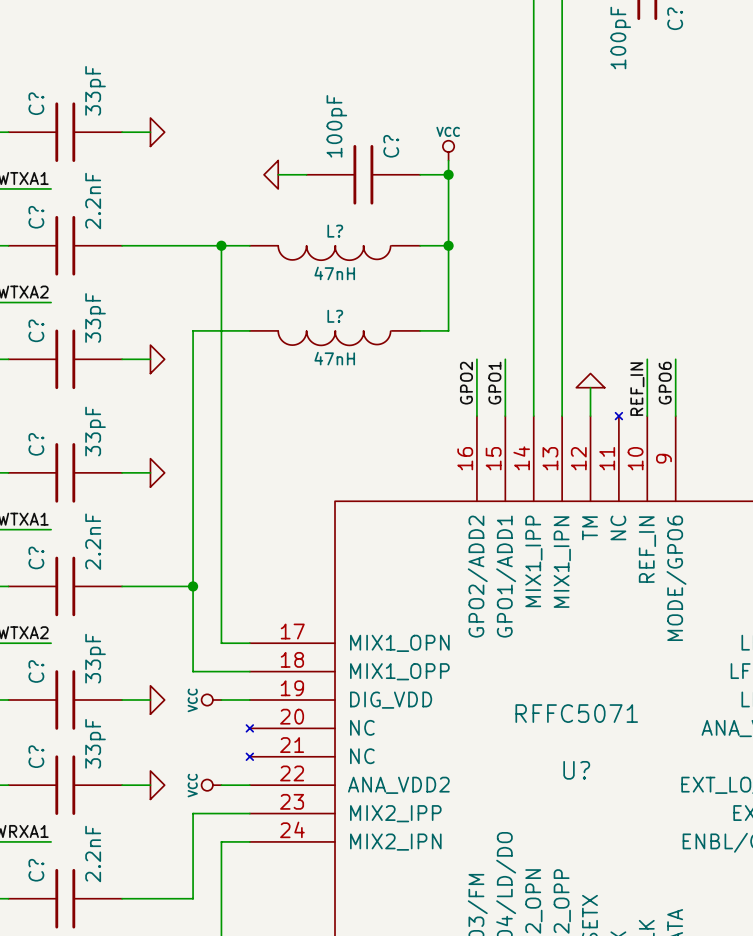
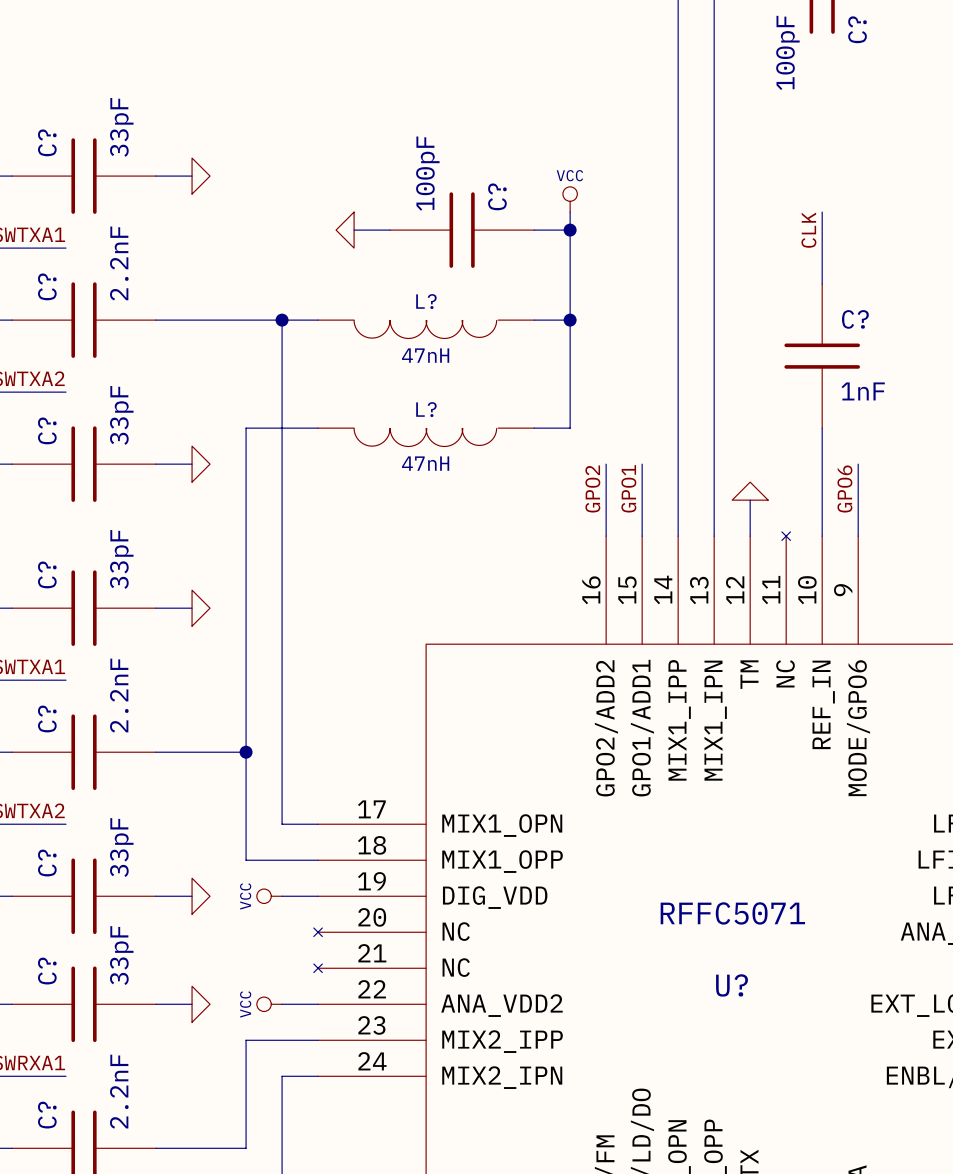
wire: none -> (822, 212) (822, 284)
label: none -> CLK (808, 230)
C?: none -> 1nF (822, 356)
wire: none -> (822, 428) (822, 464)
label: REF_IN (637, 389) -> none

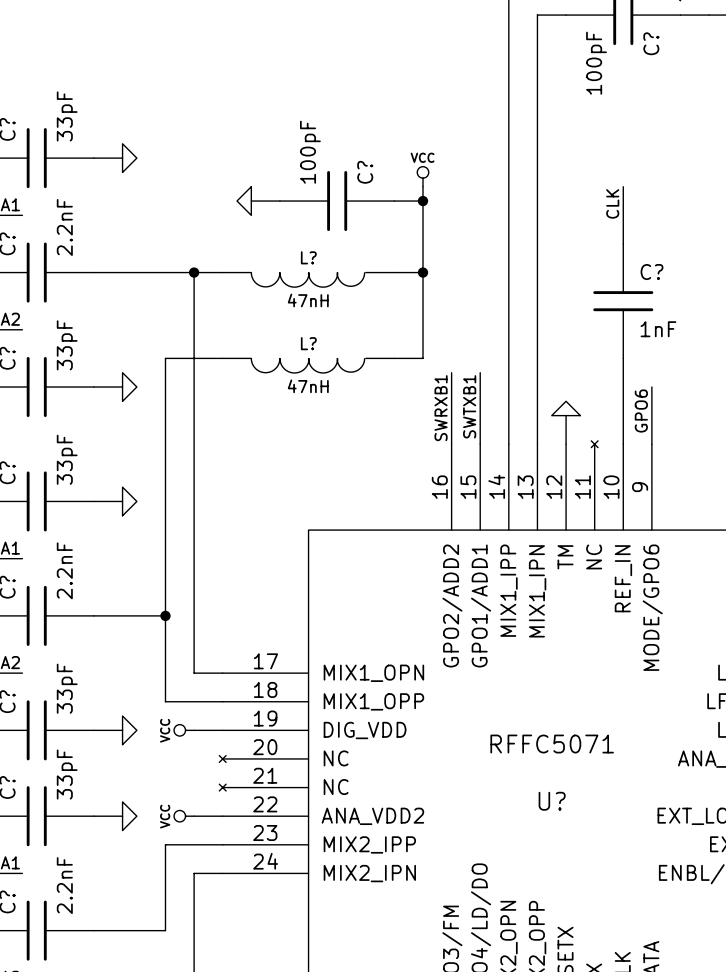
wire: none -> (451, 372) (451, 387)
wire: none -> (480, 372) (480, 387)
label: none -> SWRXB1 (441, 408)
label: none -> SWTXB1 (469, 406)
label: GPO2 (592, 488) -> none
label: GPO1 (628, 488) -> none

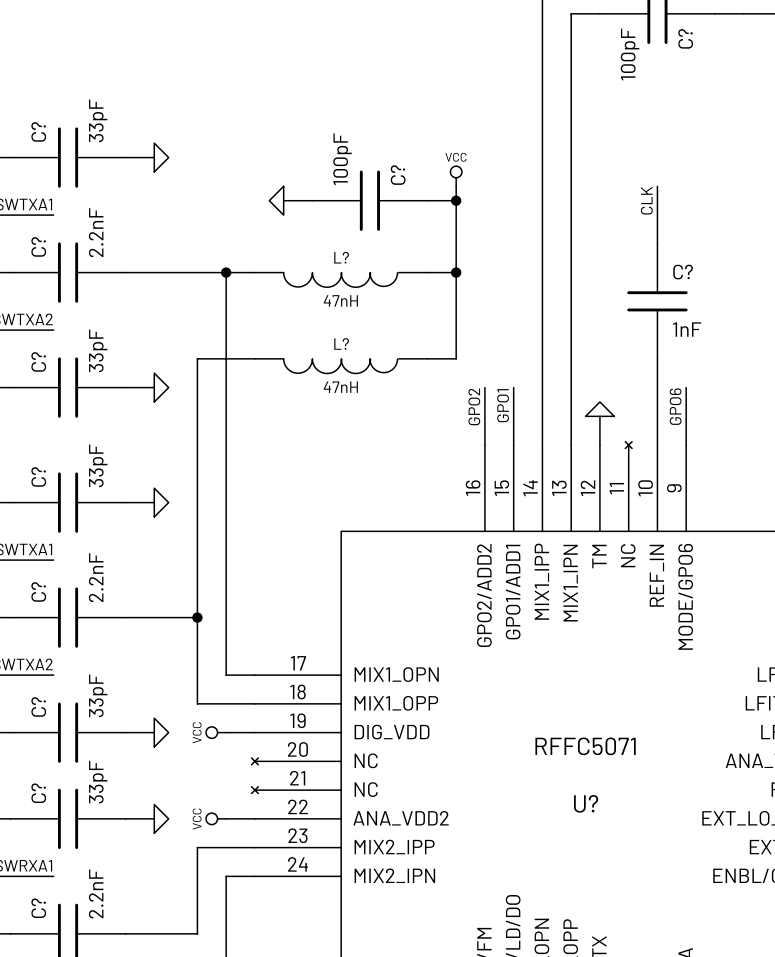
wire: (451, 372) (451, 387) -> none
wire: (480, 372) (480, 387) -> none
label: SWTXB1 (469, 406) -> none
label: SWRXB1 (441, 408) -> none
label: none -> GPO2 (474, 406)
label: none -> GPO1 (503, 405)

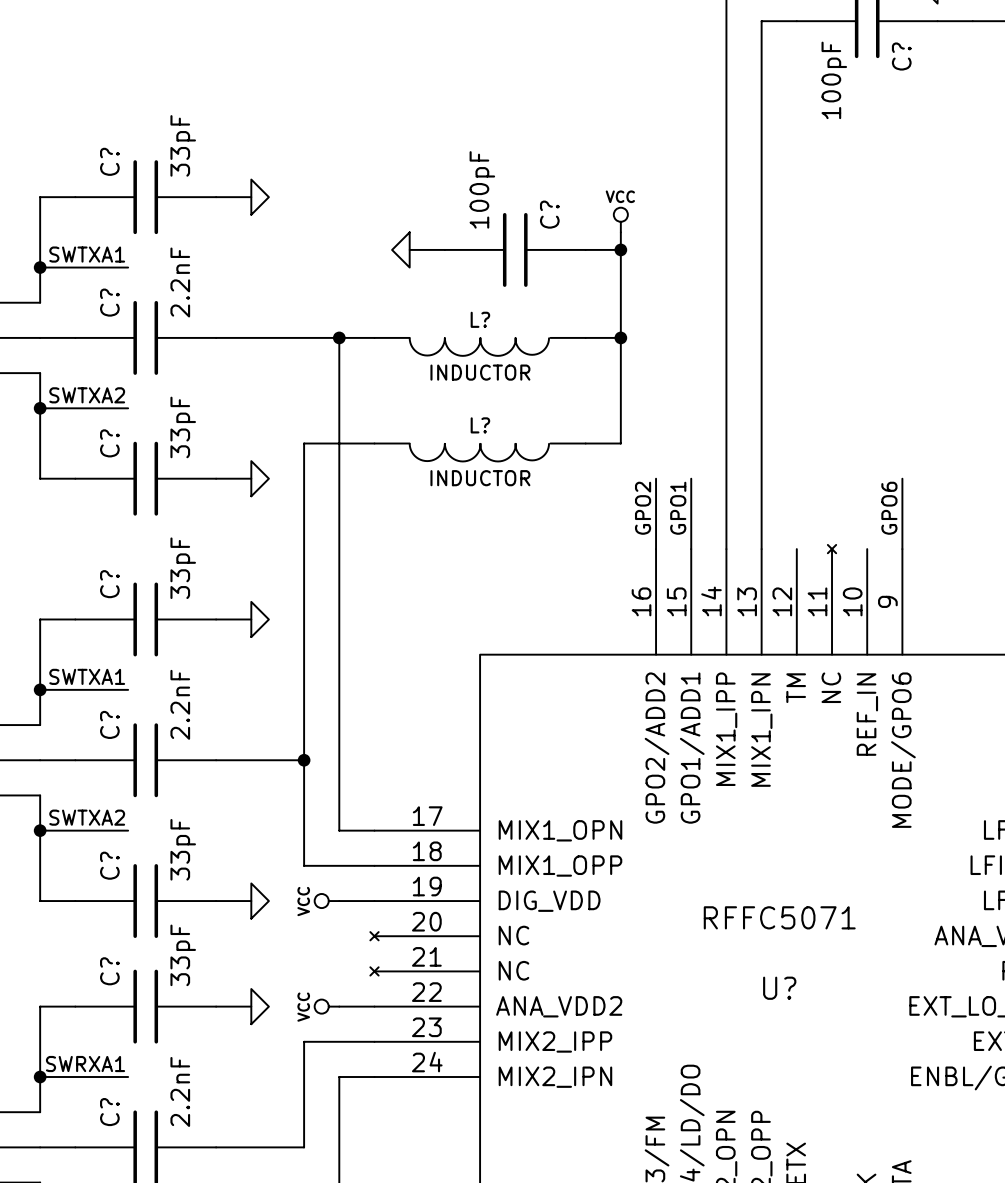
wire: (657, 186) (657, 243) -> none
label: CLK (646, 200) -> none
L? value: 47nH (340, 300) -> INDUCTOR (480, 372)
C?: 1nF (657, 301) -> none
wire: (657, 358) (657, 445) -> none
L? value: 47nH (340, 387) -> INDUCTOR (480, 478)
power symbol: (599, 409) -> none
wire: (599, 416) (599, 445) -> none

